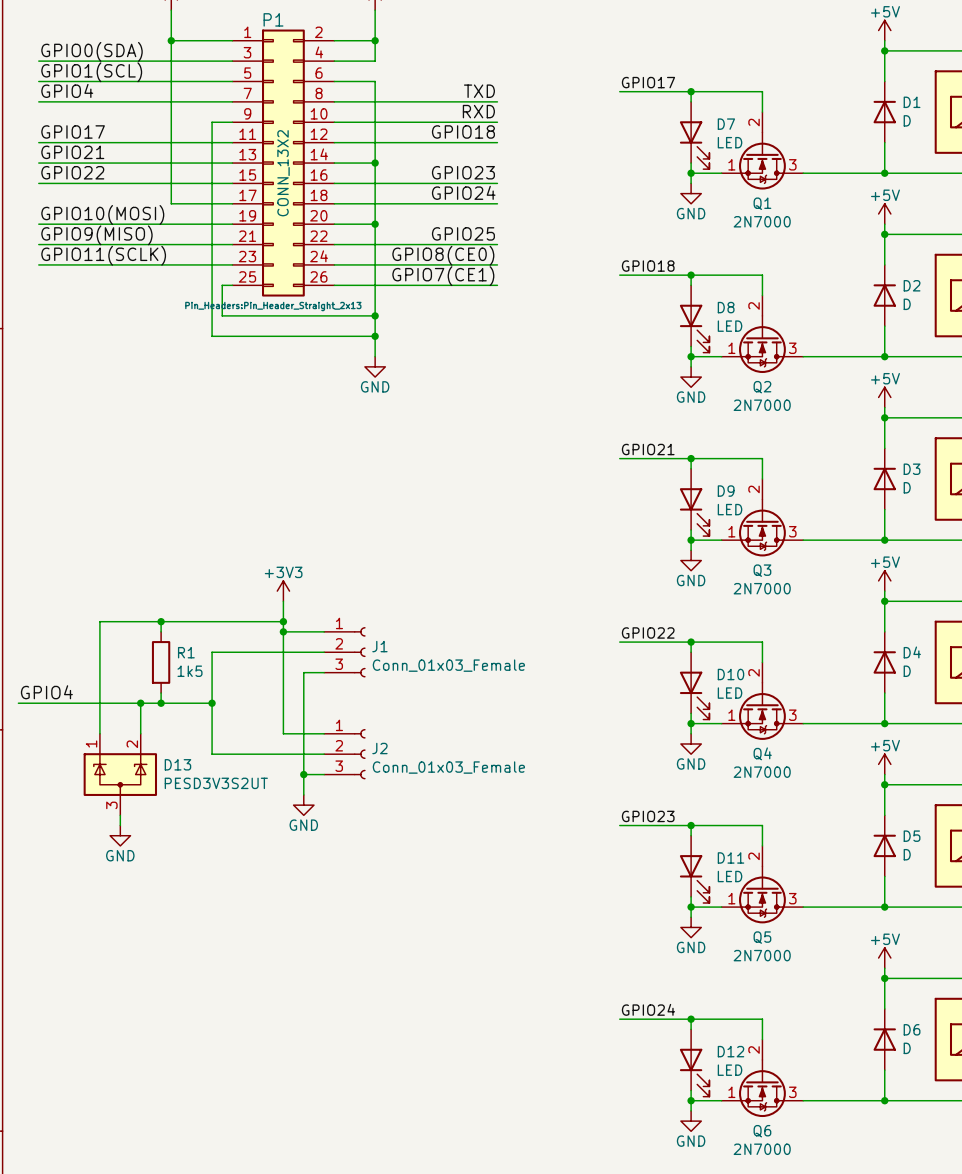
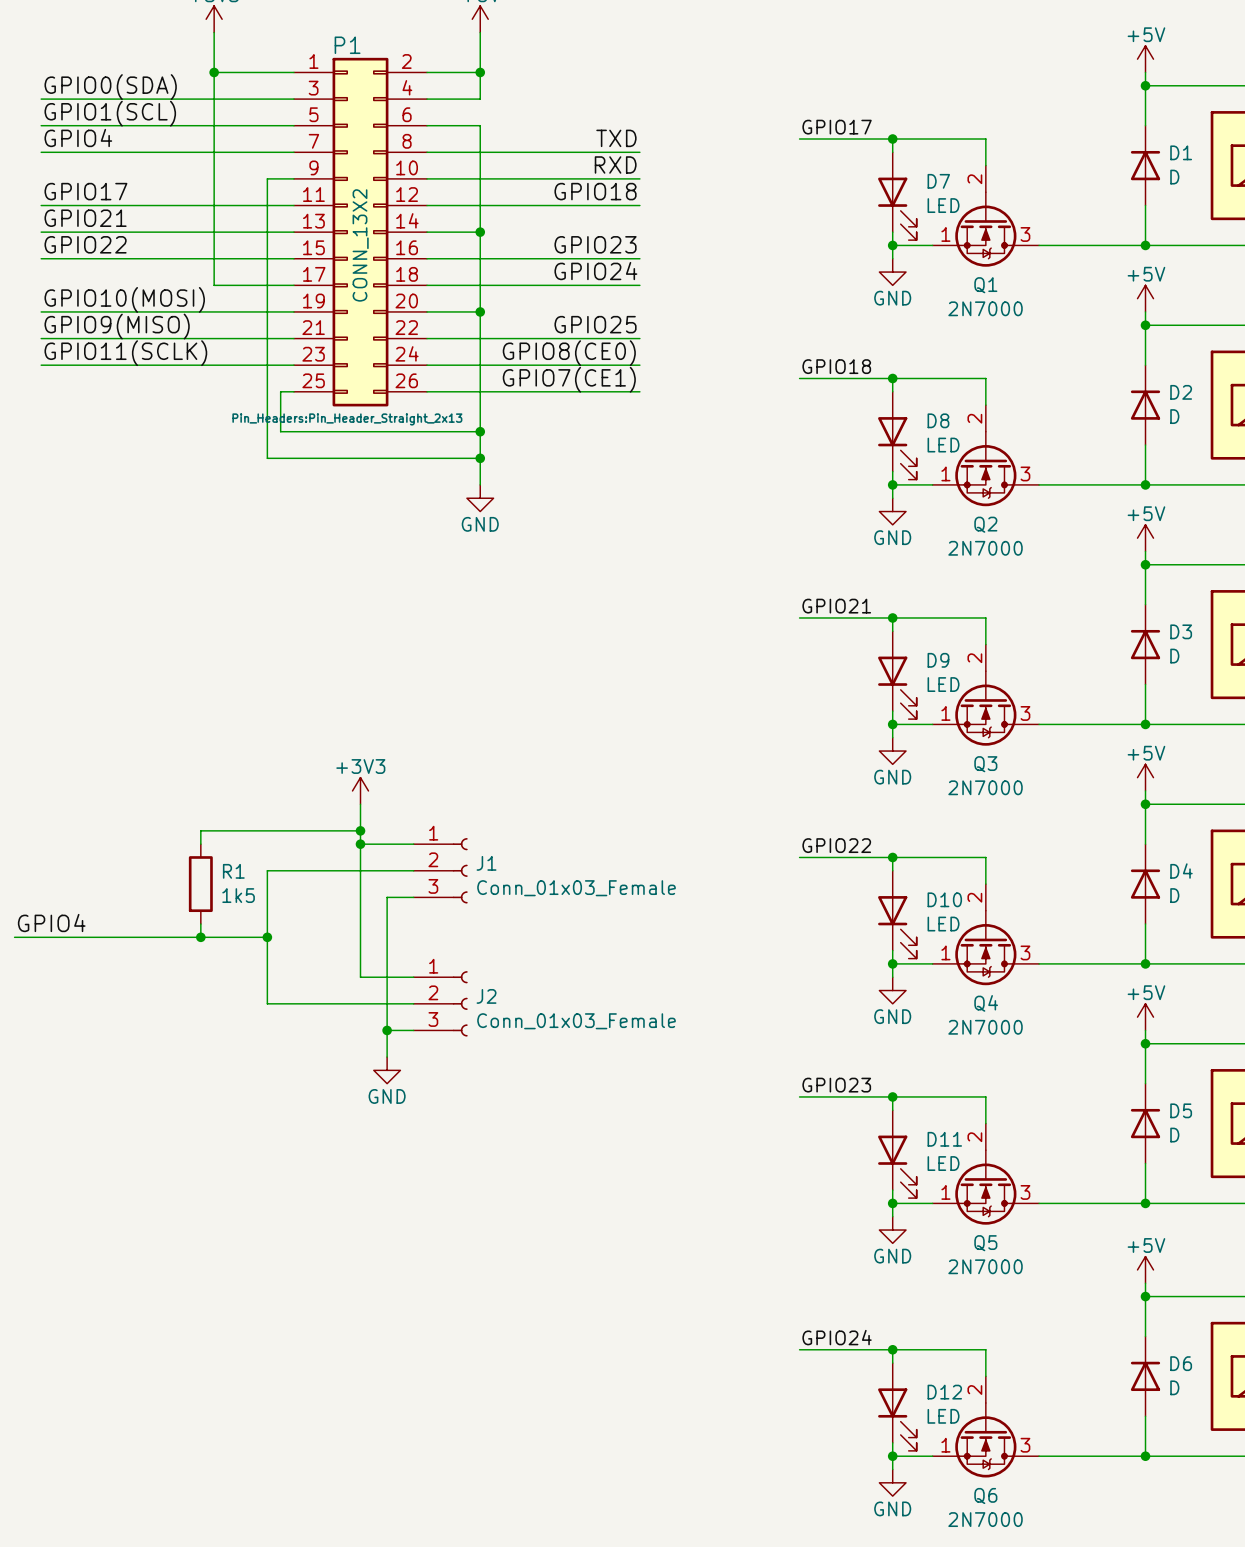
wire: (161, 621) (99, 621) (99, 733) -> none
junction: (161, 621) -> none
wire: (140, 703) (140, 733) -> none
junction: (140, 703) -> none
D13: PESD3V3S2UT (120, 774) -> none
wire: (120, 815) (120, 825) -> none
power symbol: GND (120, 835) -> none

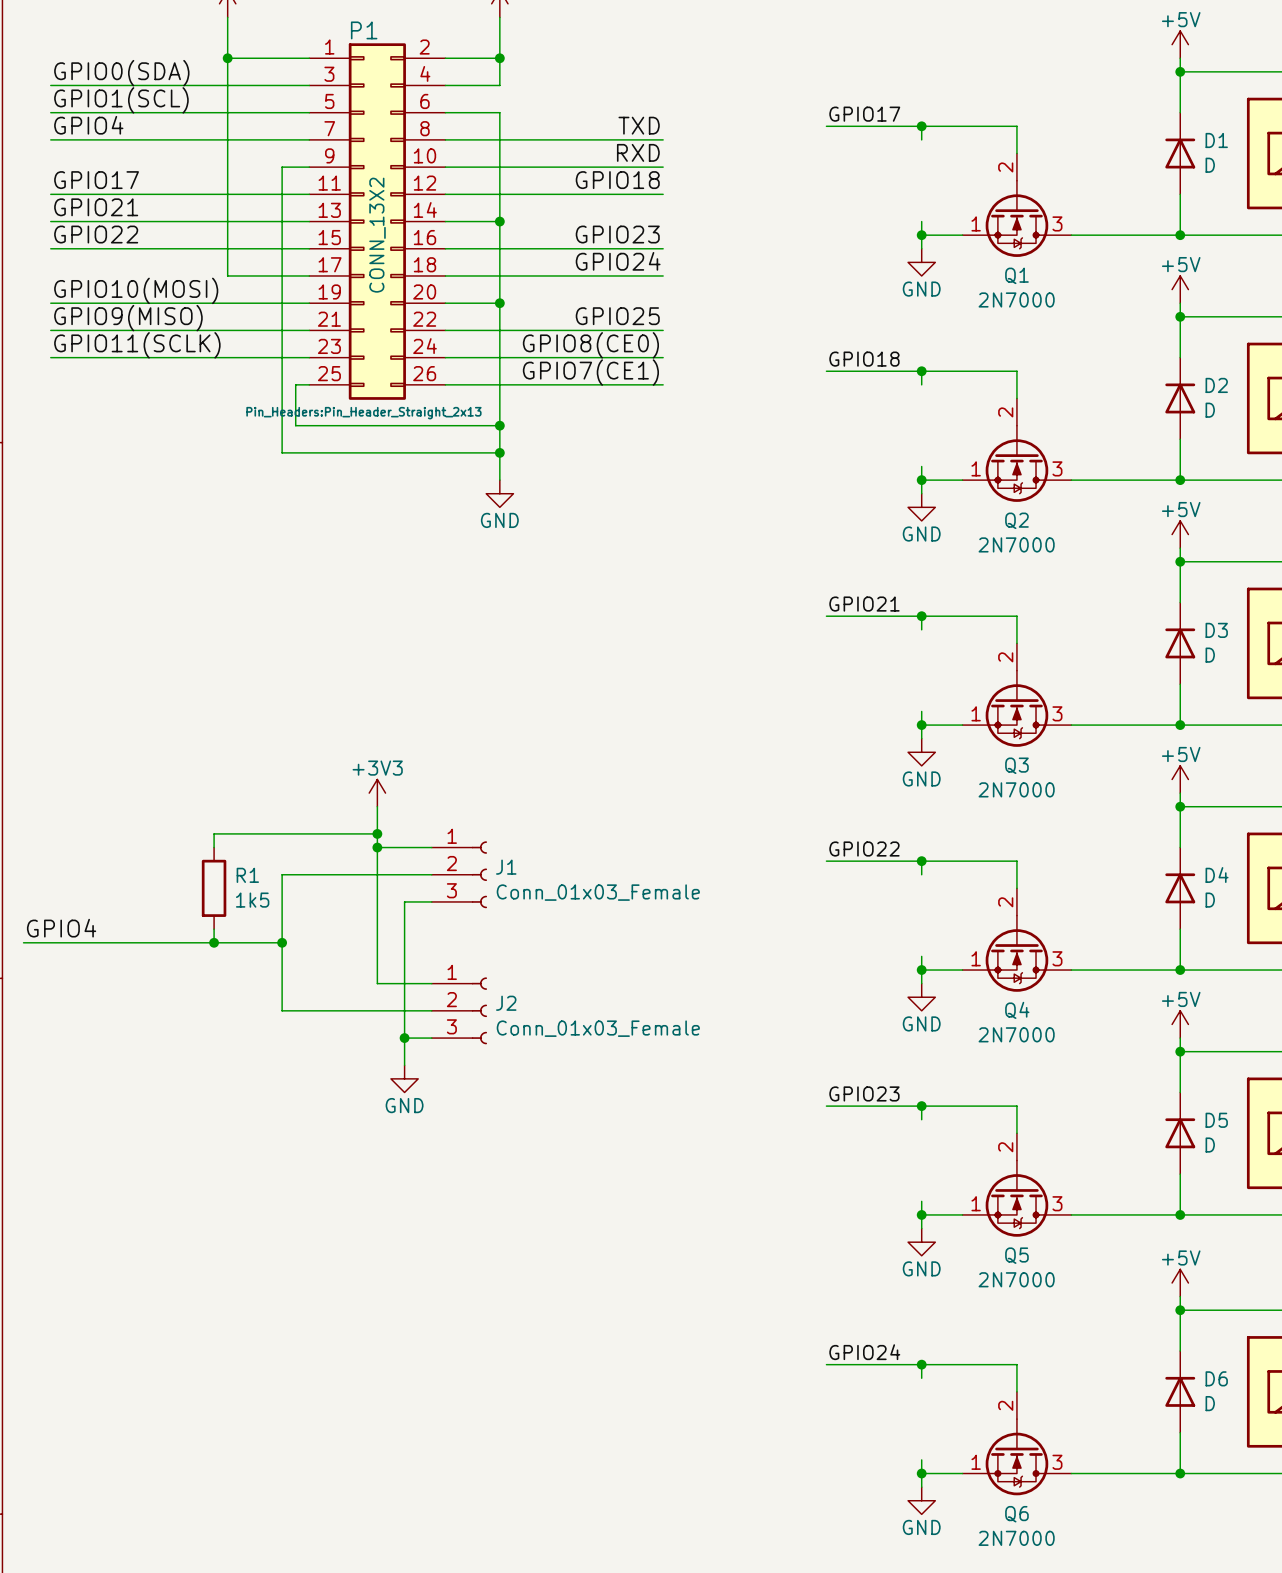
D7: LED (897, 196) -> none
D8: LED (897, 435) -> none
D9: LED (897, 675) -> none
D10: LED (897, 914) -> none
D11: LED (897, 1154) -> none
D12: LED (897, 1406) -> none

